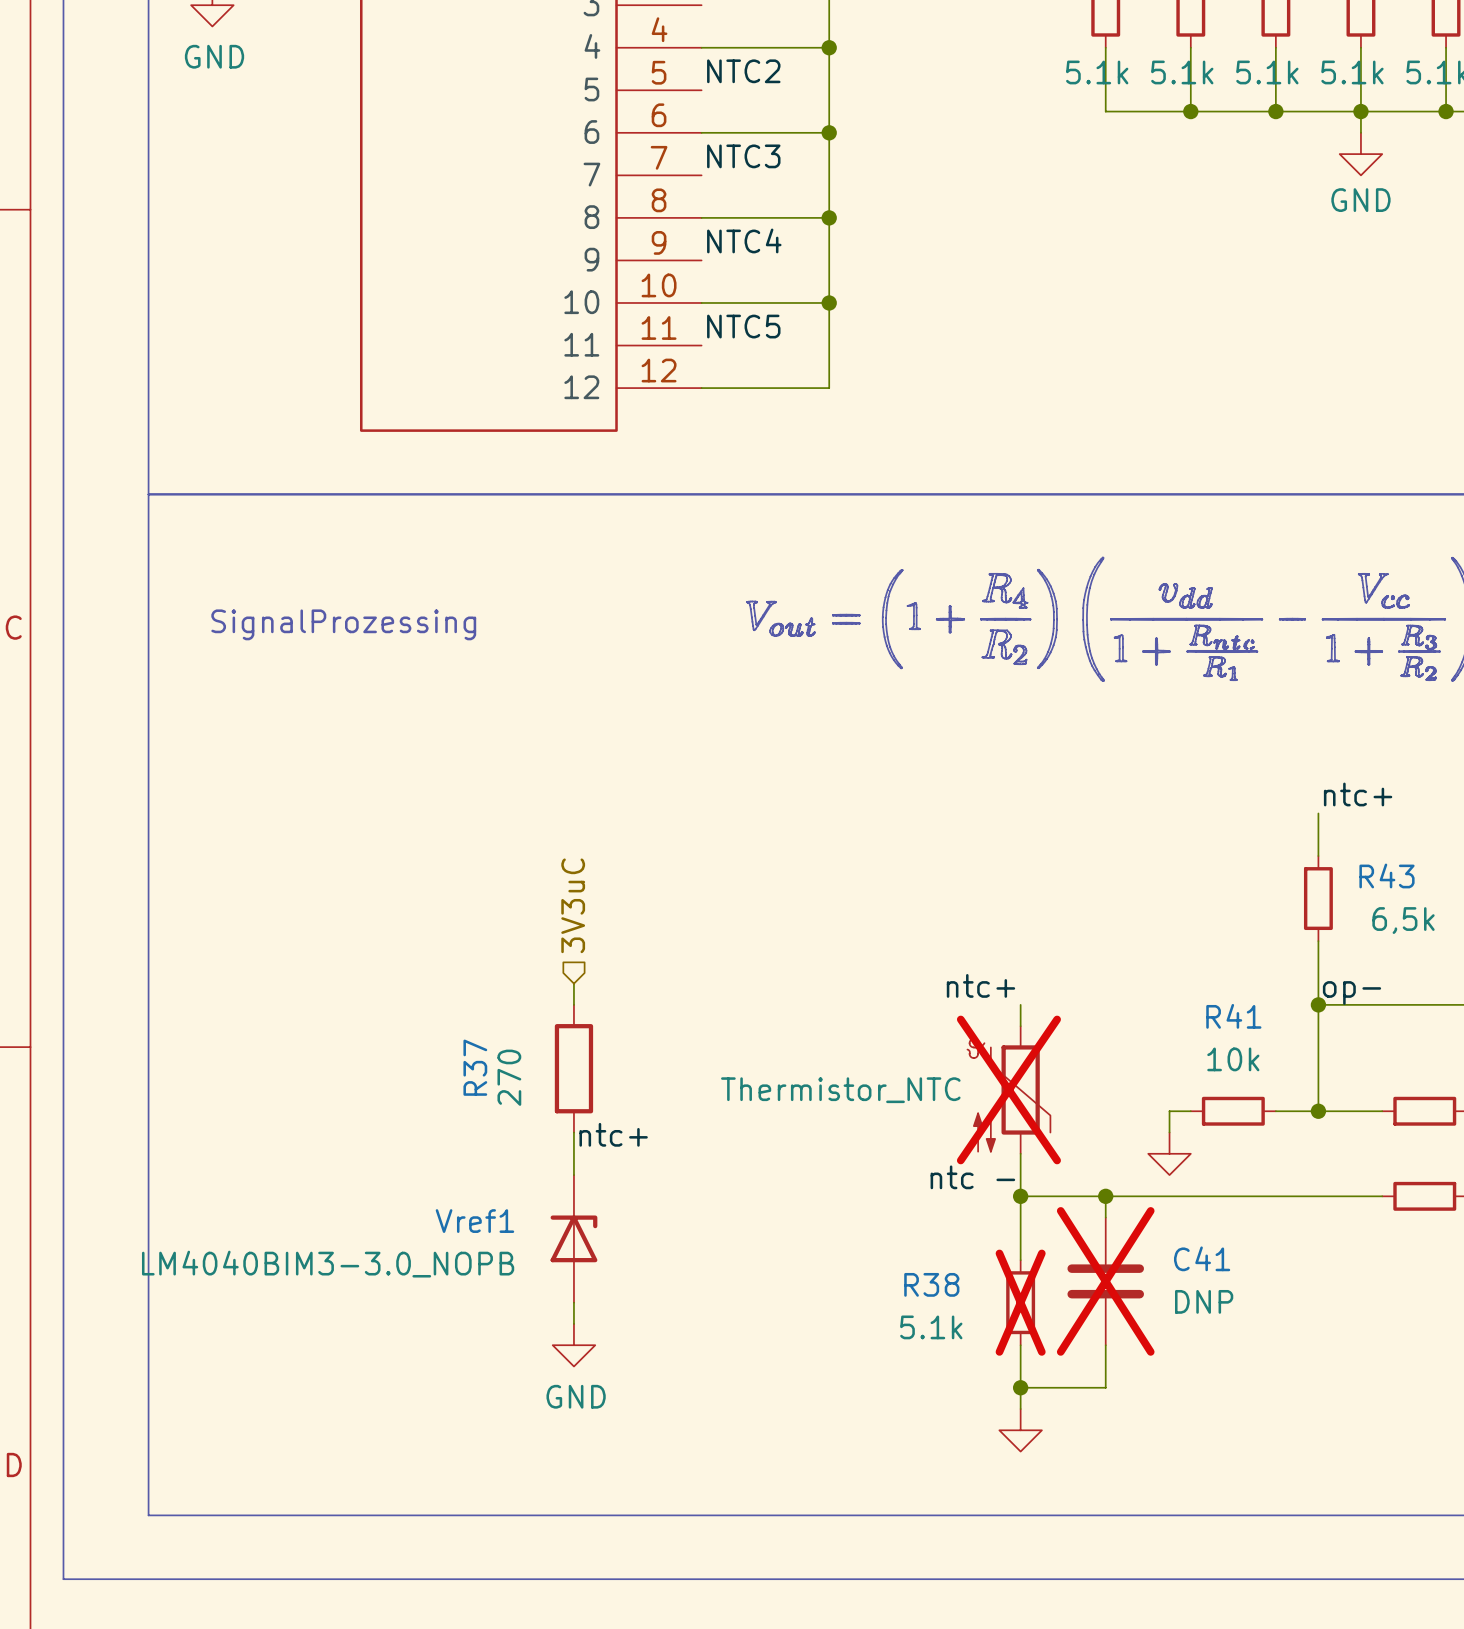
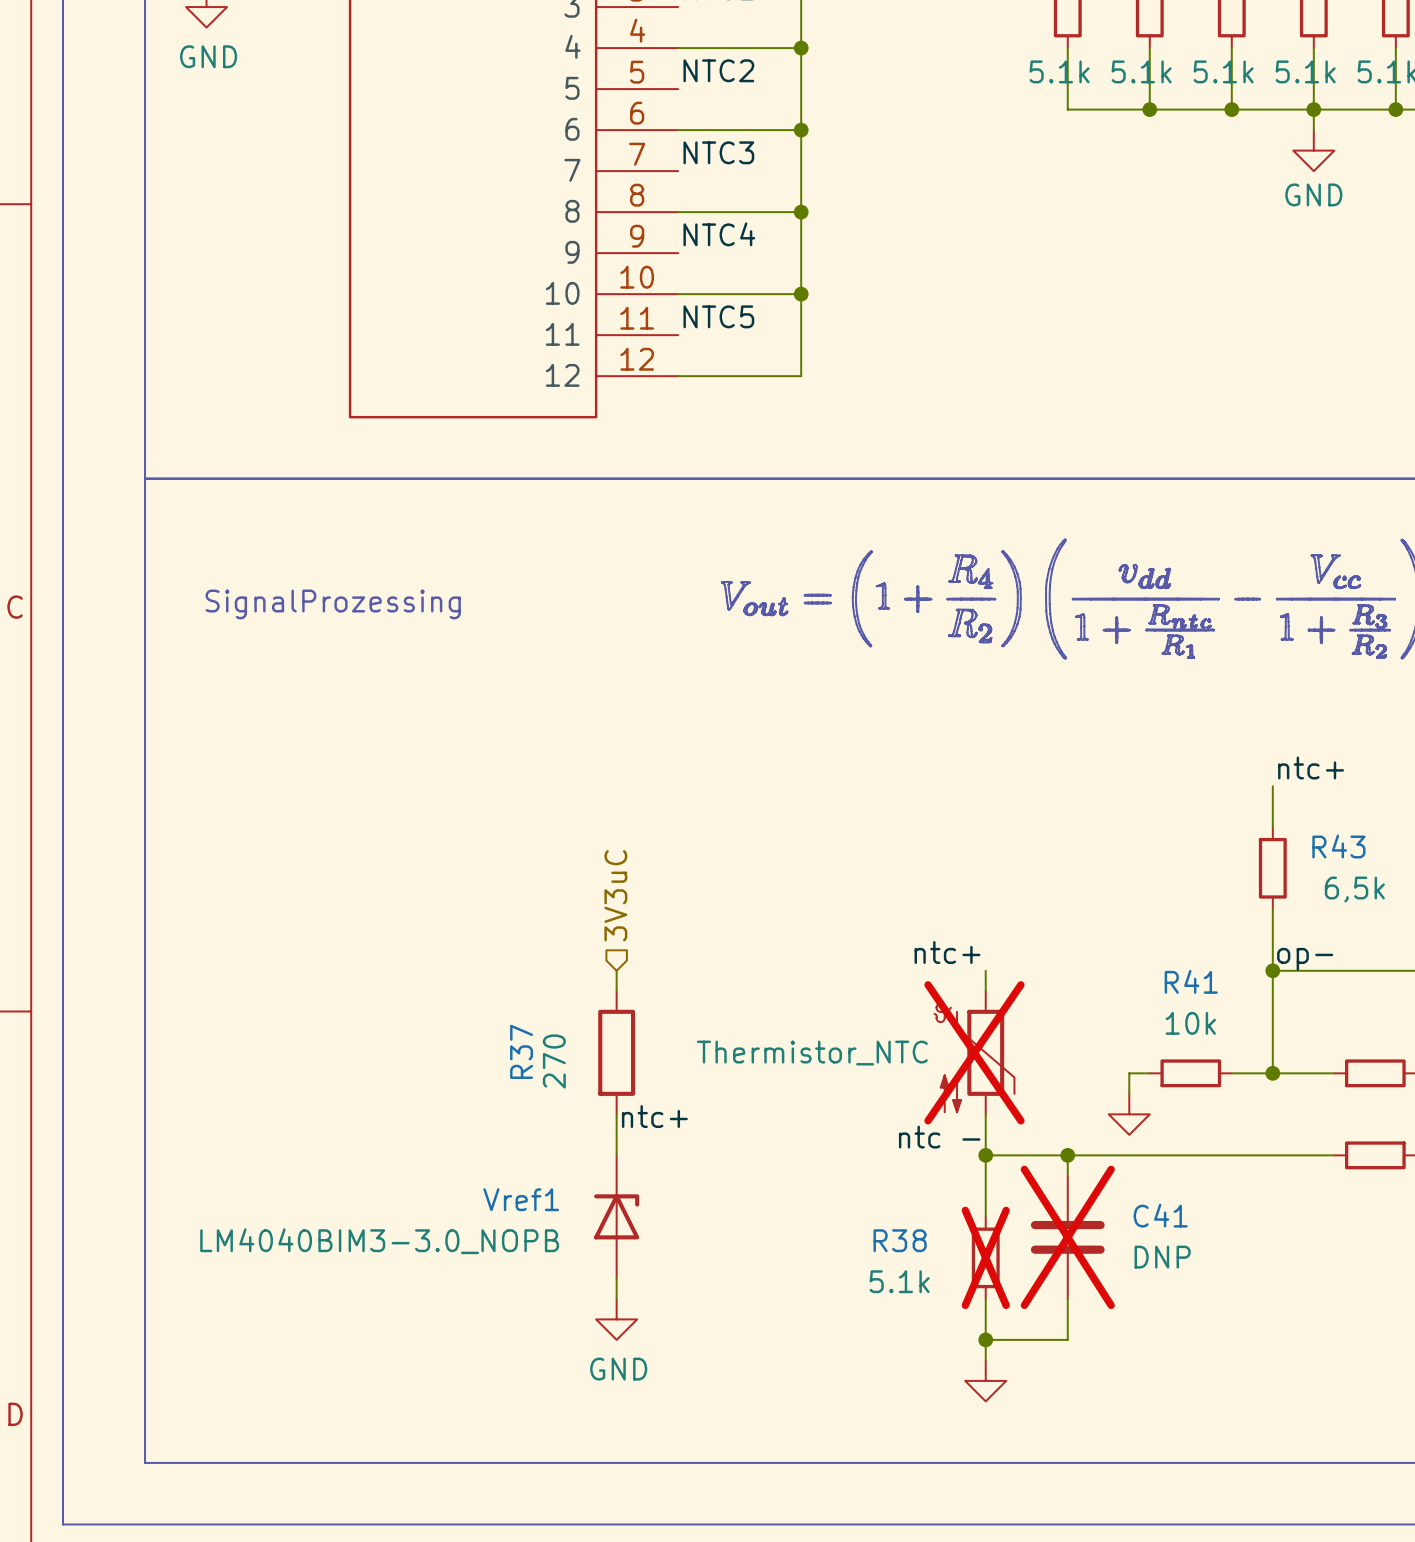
hierarchical label position: 3V3uC (573, 905) -> 3V3uC (615, 895)
wire: (573, 983) (573, 1004) -> (616, 970) (616, 991)
R37 position: (573, 1068) -> (616, 1052)
wire: (573, 1132) (573, 1175) -> (616, 1114) (616, 1155)
label position: ntc+ (613, 1134) -> ntc+ (654, 1116)
Vref1 position: (573, 1238) -> (616, 1216)
wire: (573, 1302) (573, 1323) -> (616, 1278) (616, 1298)
power symbol position: GND (573, 1345) -> GND (616, 1319)

